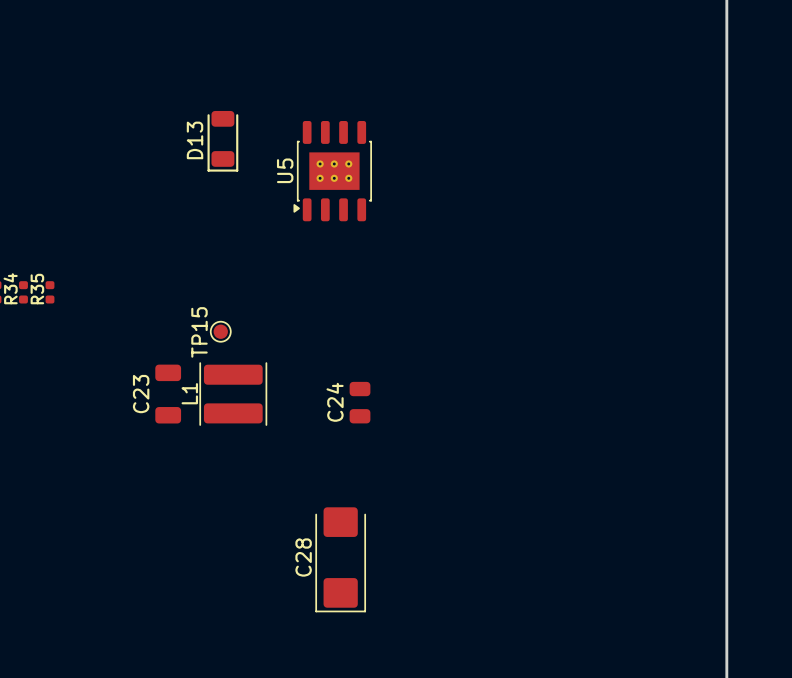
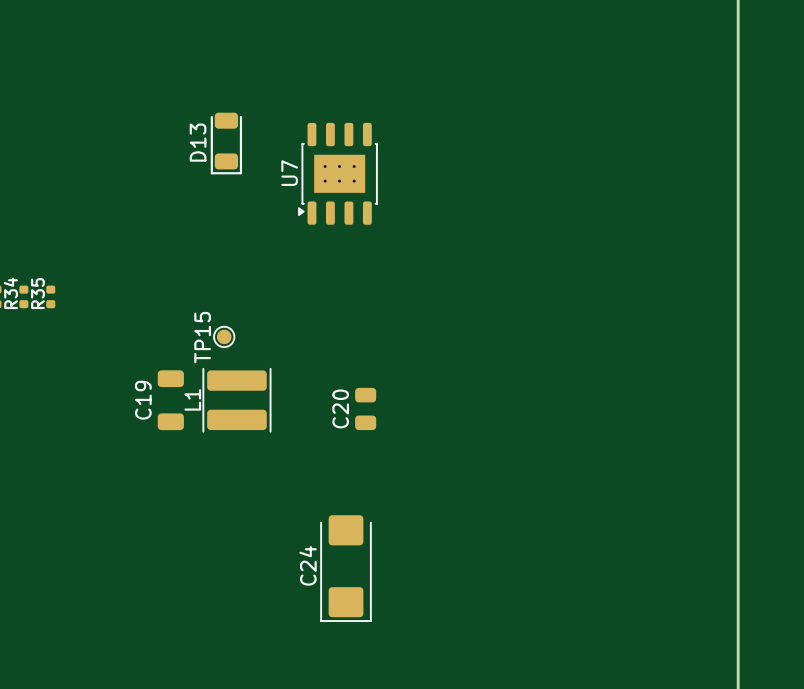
U5 name: U5 (285, 170) -> U7 (289, 173)
C23 name: C23 (141, 394) -> C19 (143, 400)
C24 name: C24 (335, 402) -> C20 (340, 408)
C28 name: C28 (303, 557) -> C24 (308, 565)

